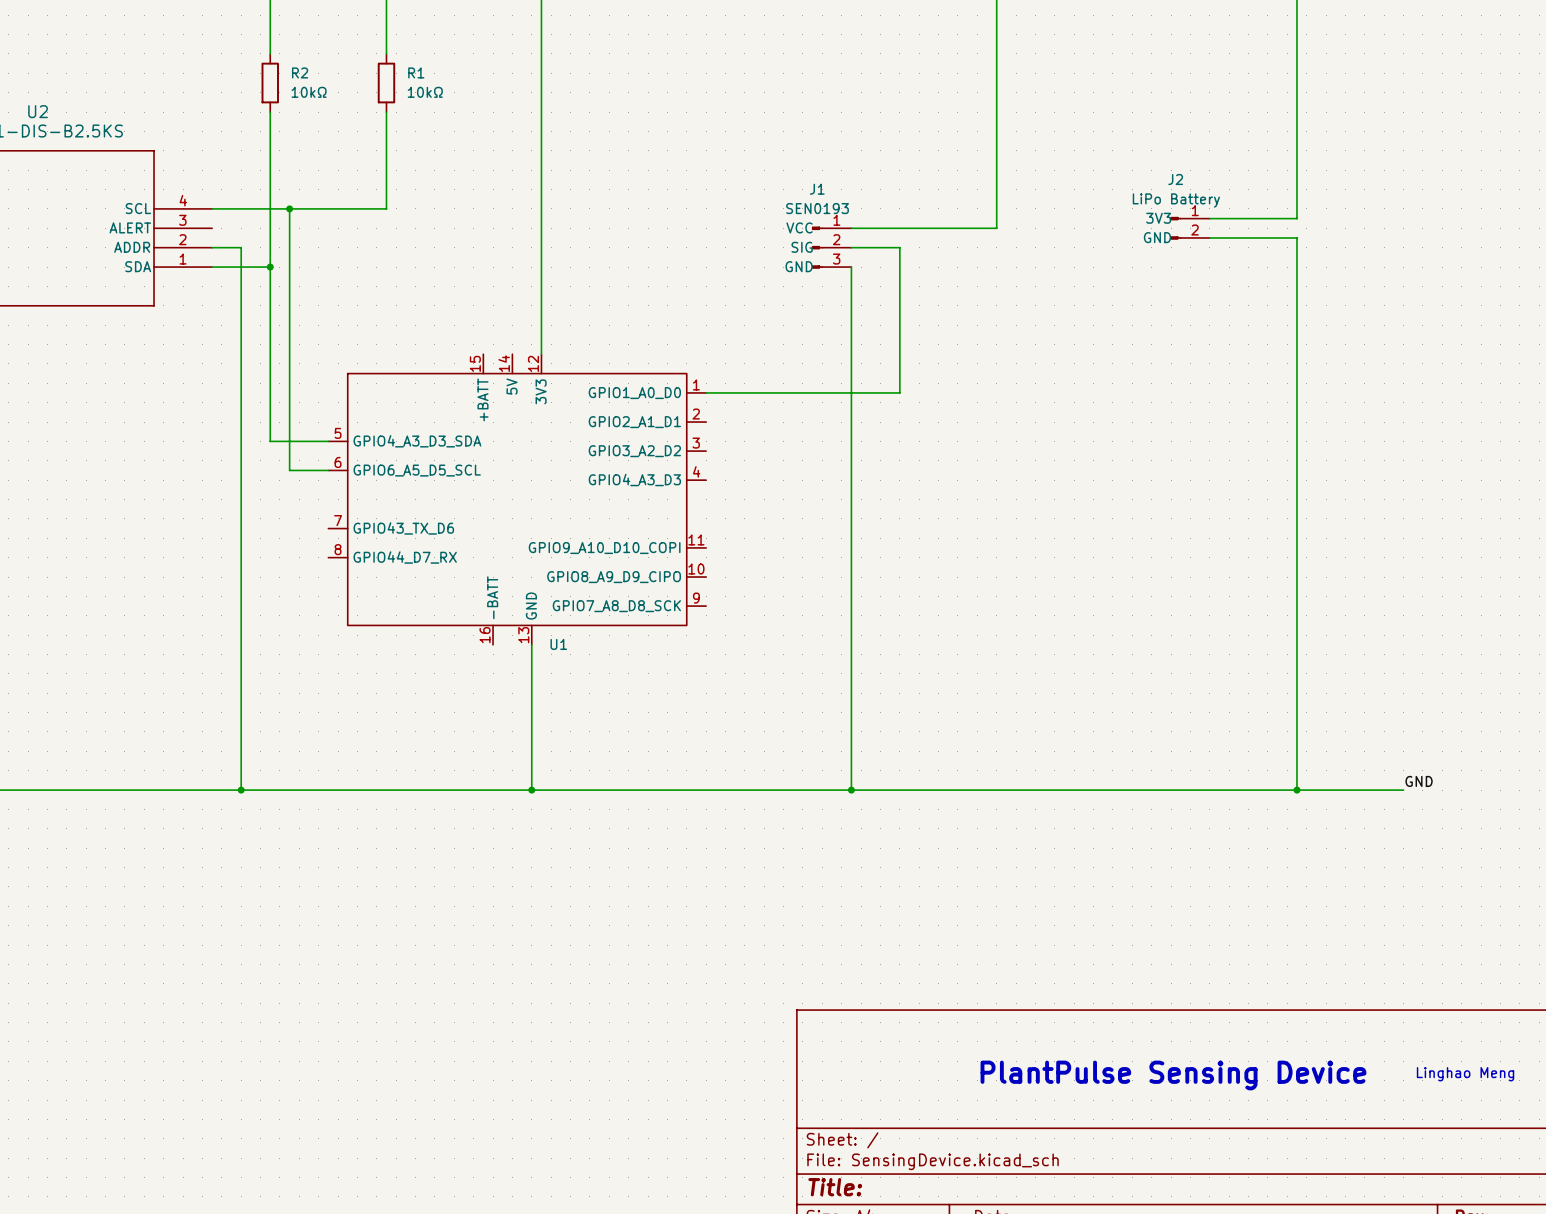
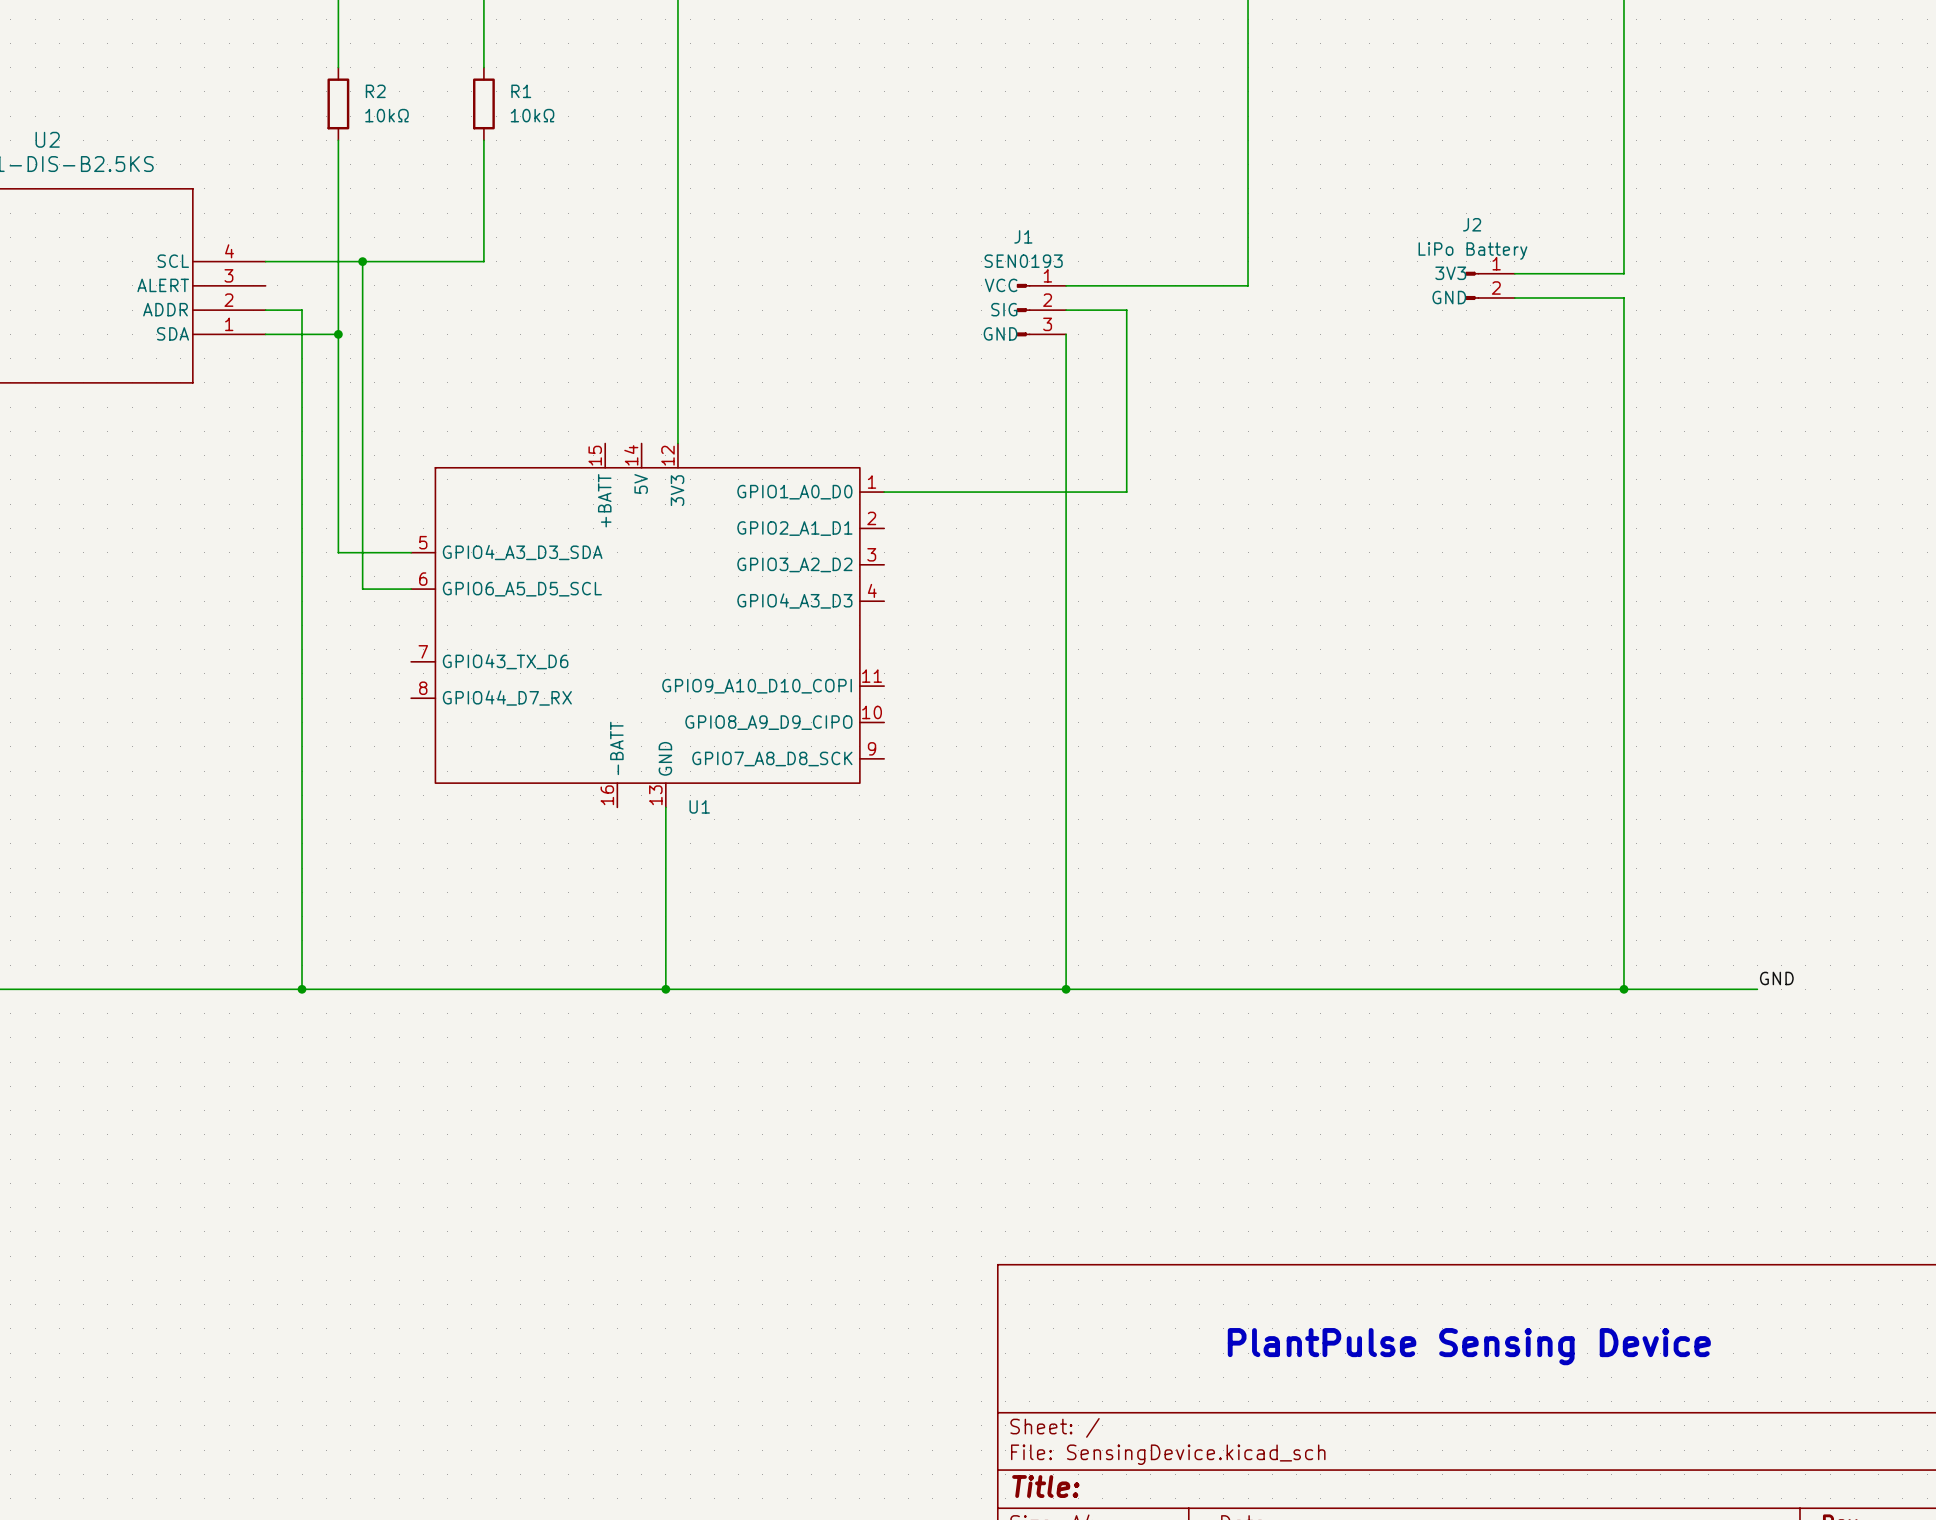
text: Linghao Meng (1465, 1074) -> none

